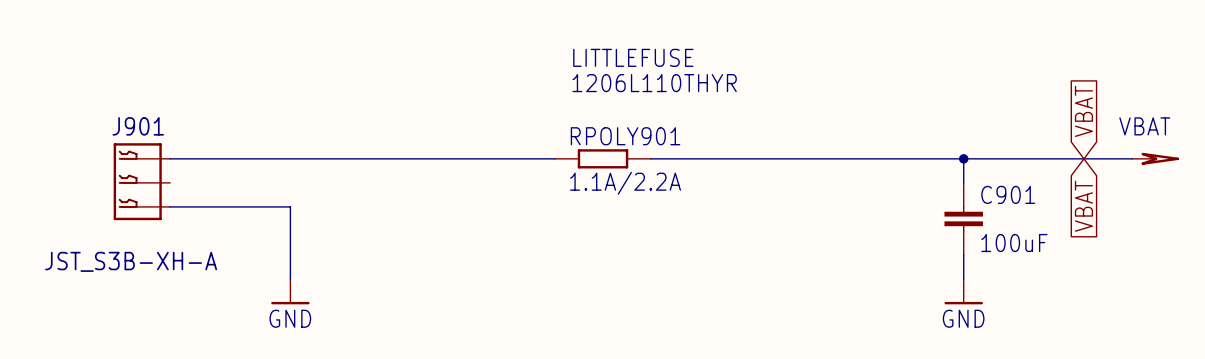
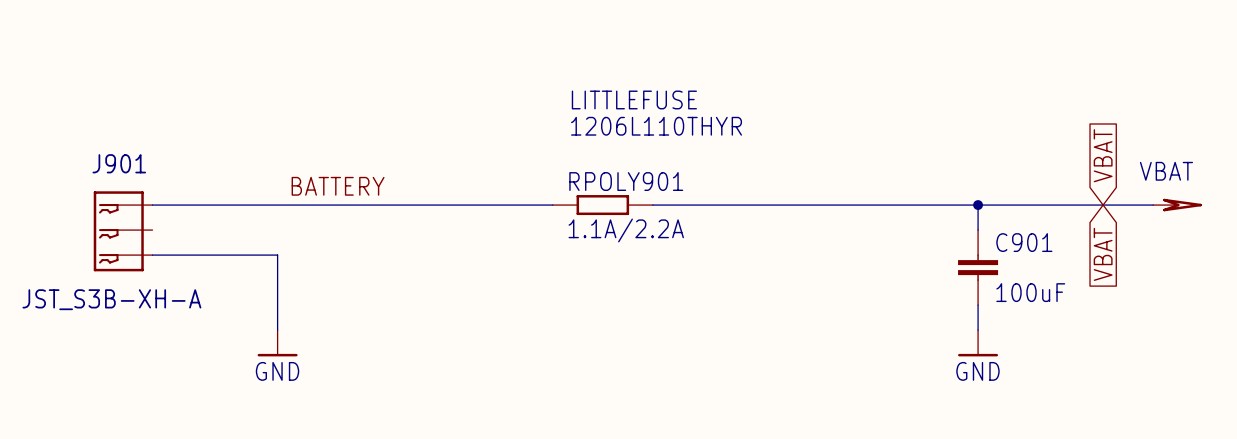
label: none -> BATTERY (338, 186)
J901 flip: as is (137, 181) -> up-down (118, 231)

